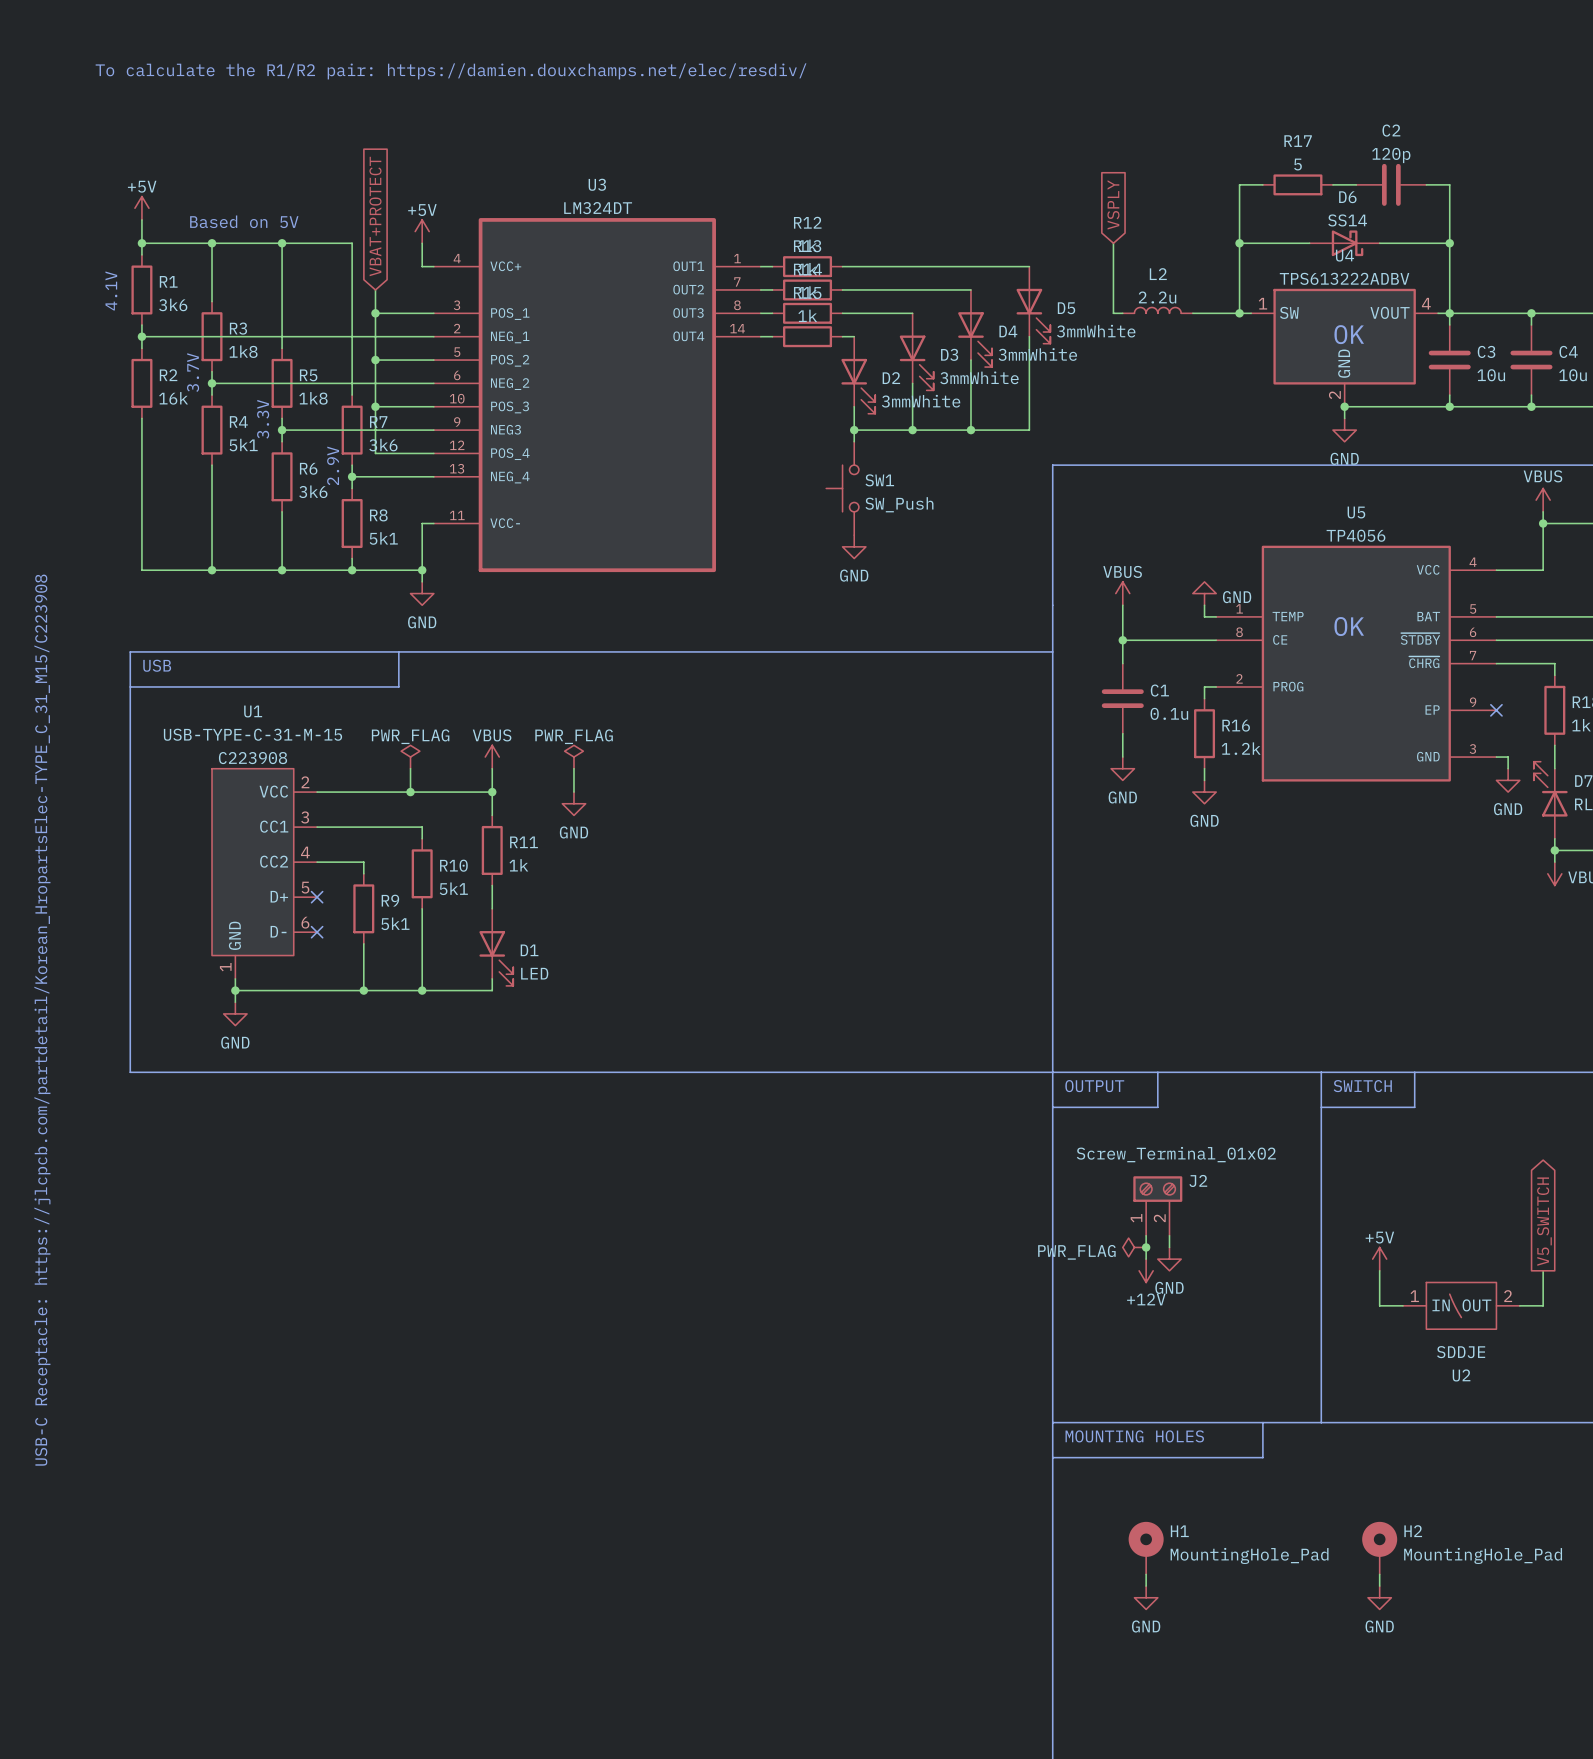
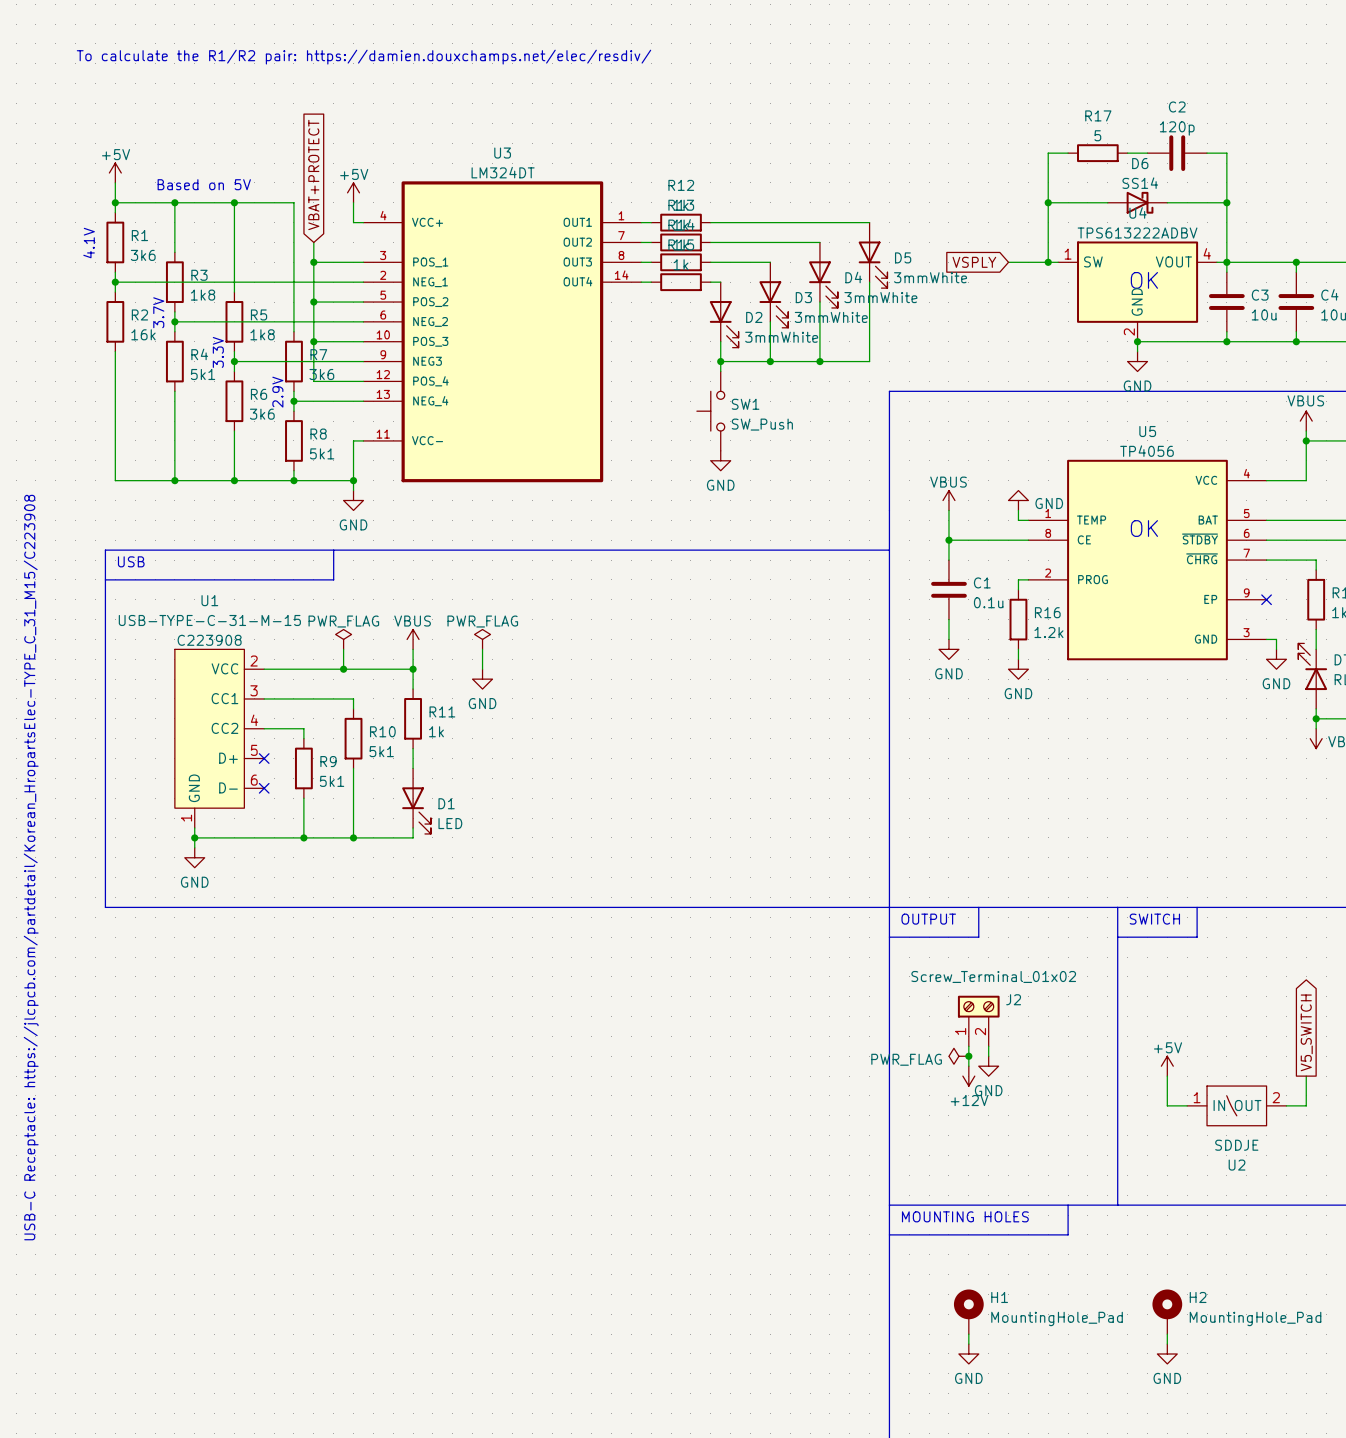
global label rotation: 0° (1113, 204) -> 90° counterclockwise (974, 262)
global label position: VSPLY (1113, 204) -> VSPLY (974, 262)
wire: (1113, 243) (1113, 313) (1122, 313) -> none
L2: 2.2u (1157, 310) -> none

